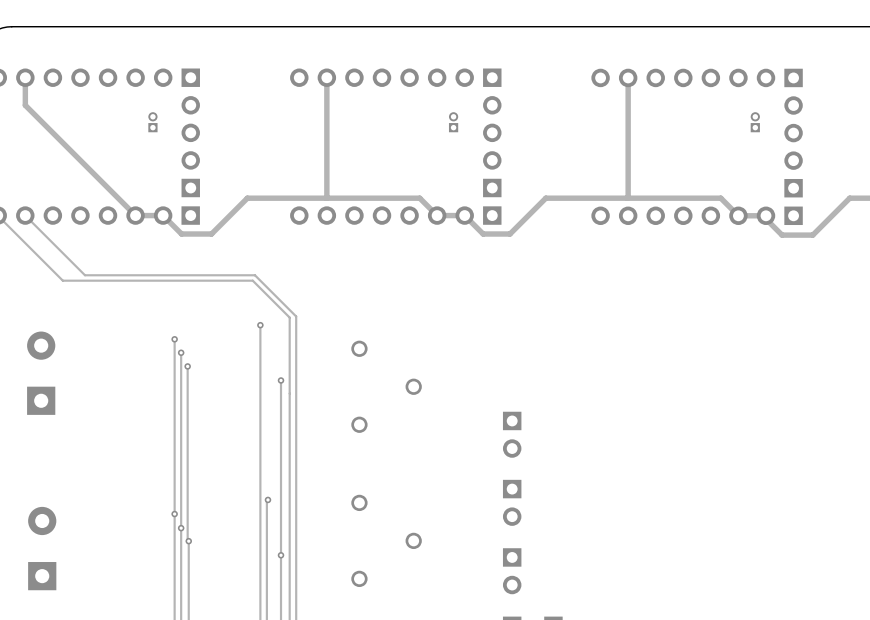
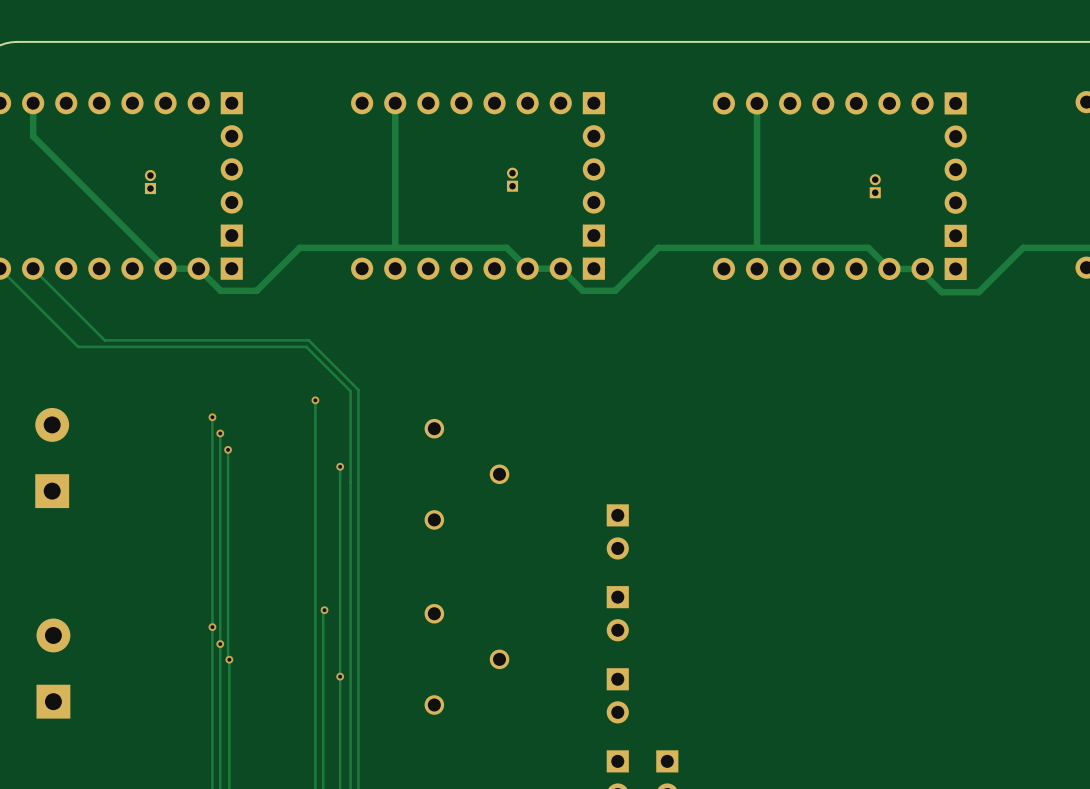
part position: (152, 122) -> (150, 182)
part position: (453, 122) -> (512, 179)
part position: (755, 122) -> (875, 186)

